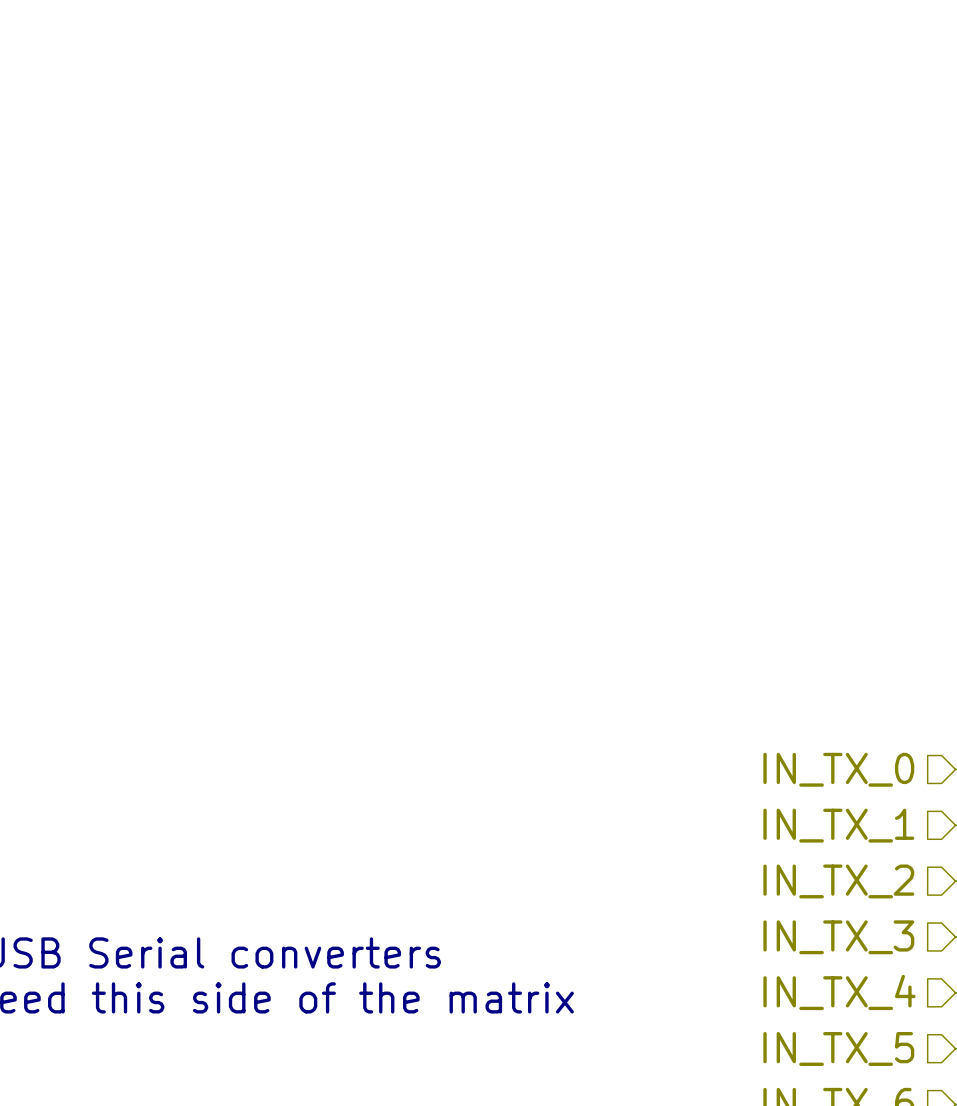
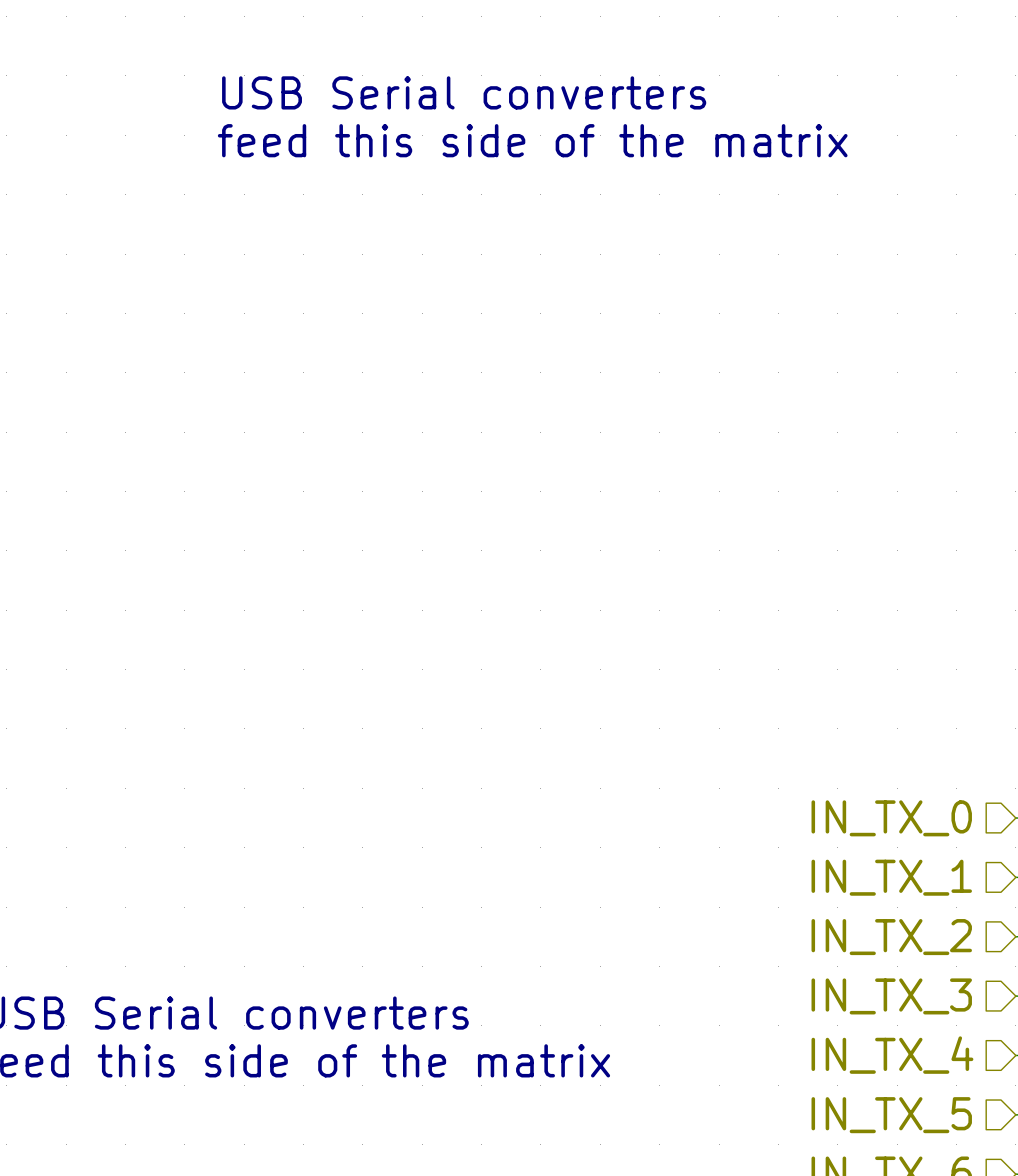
text: none -> USB Serial converters (464, 92)
text: none -> feed this side of the matrix (532, 140)

